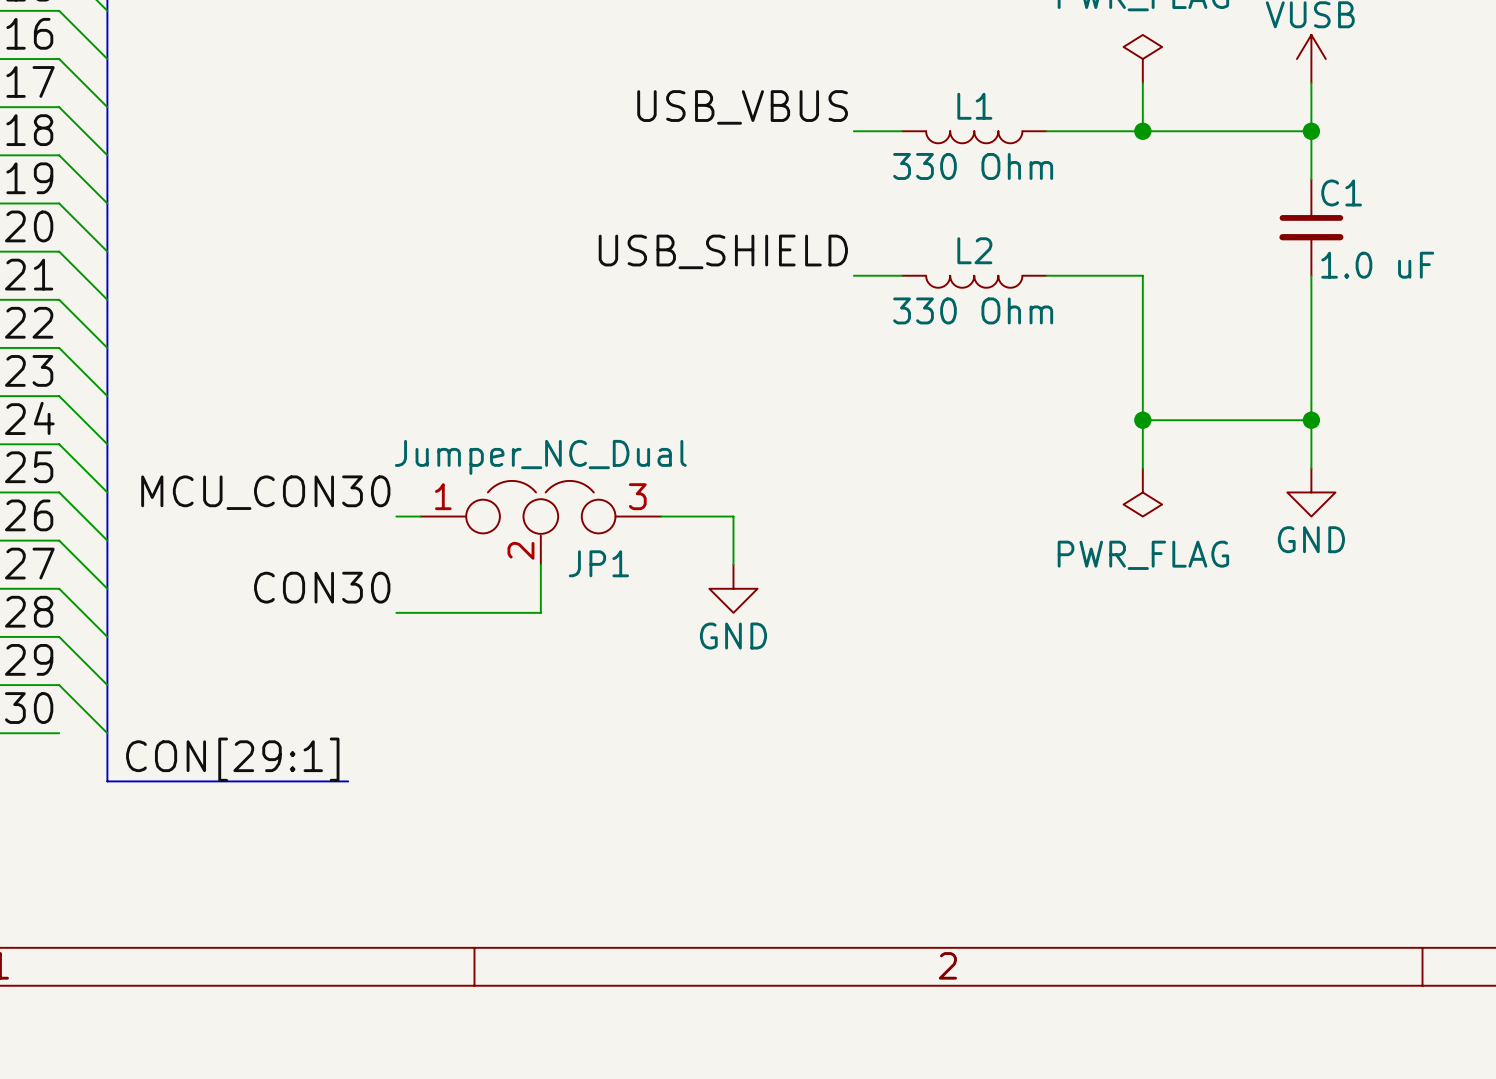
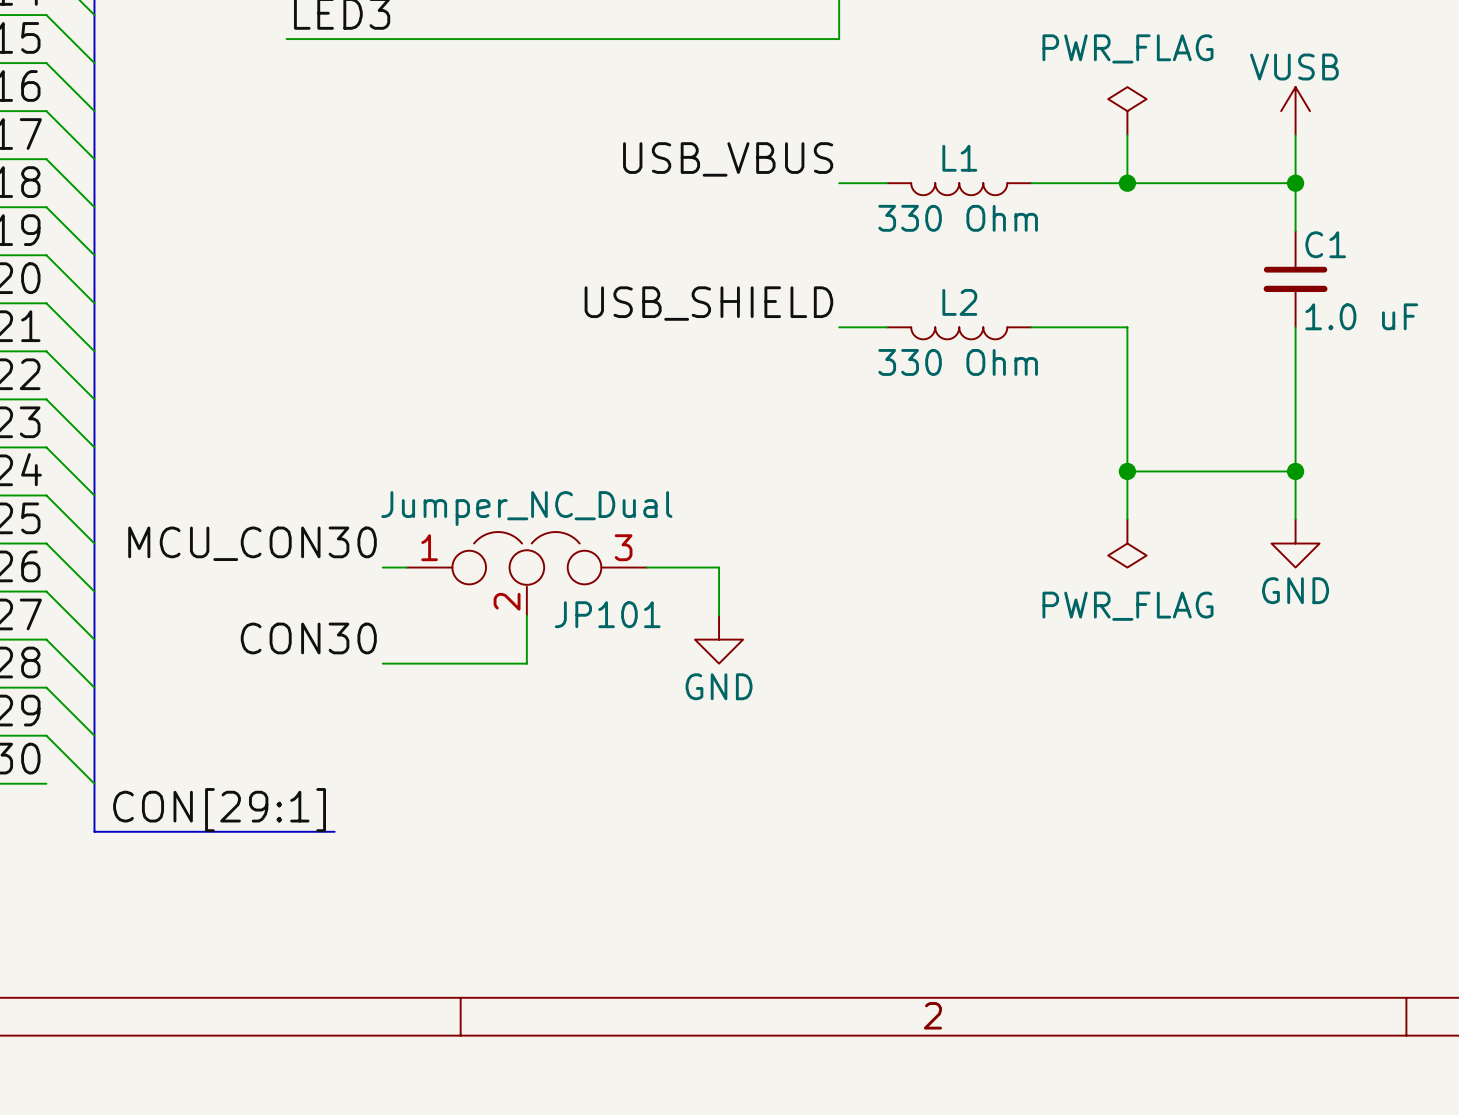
JP1 name: JP1 (598, 563) -> JP101 (607, 614)

